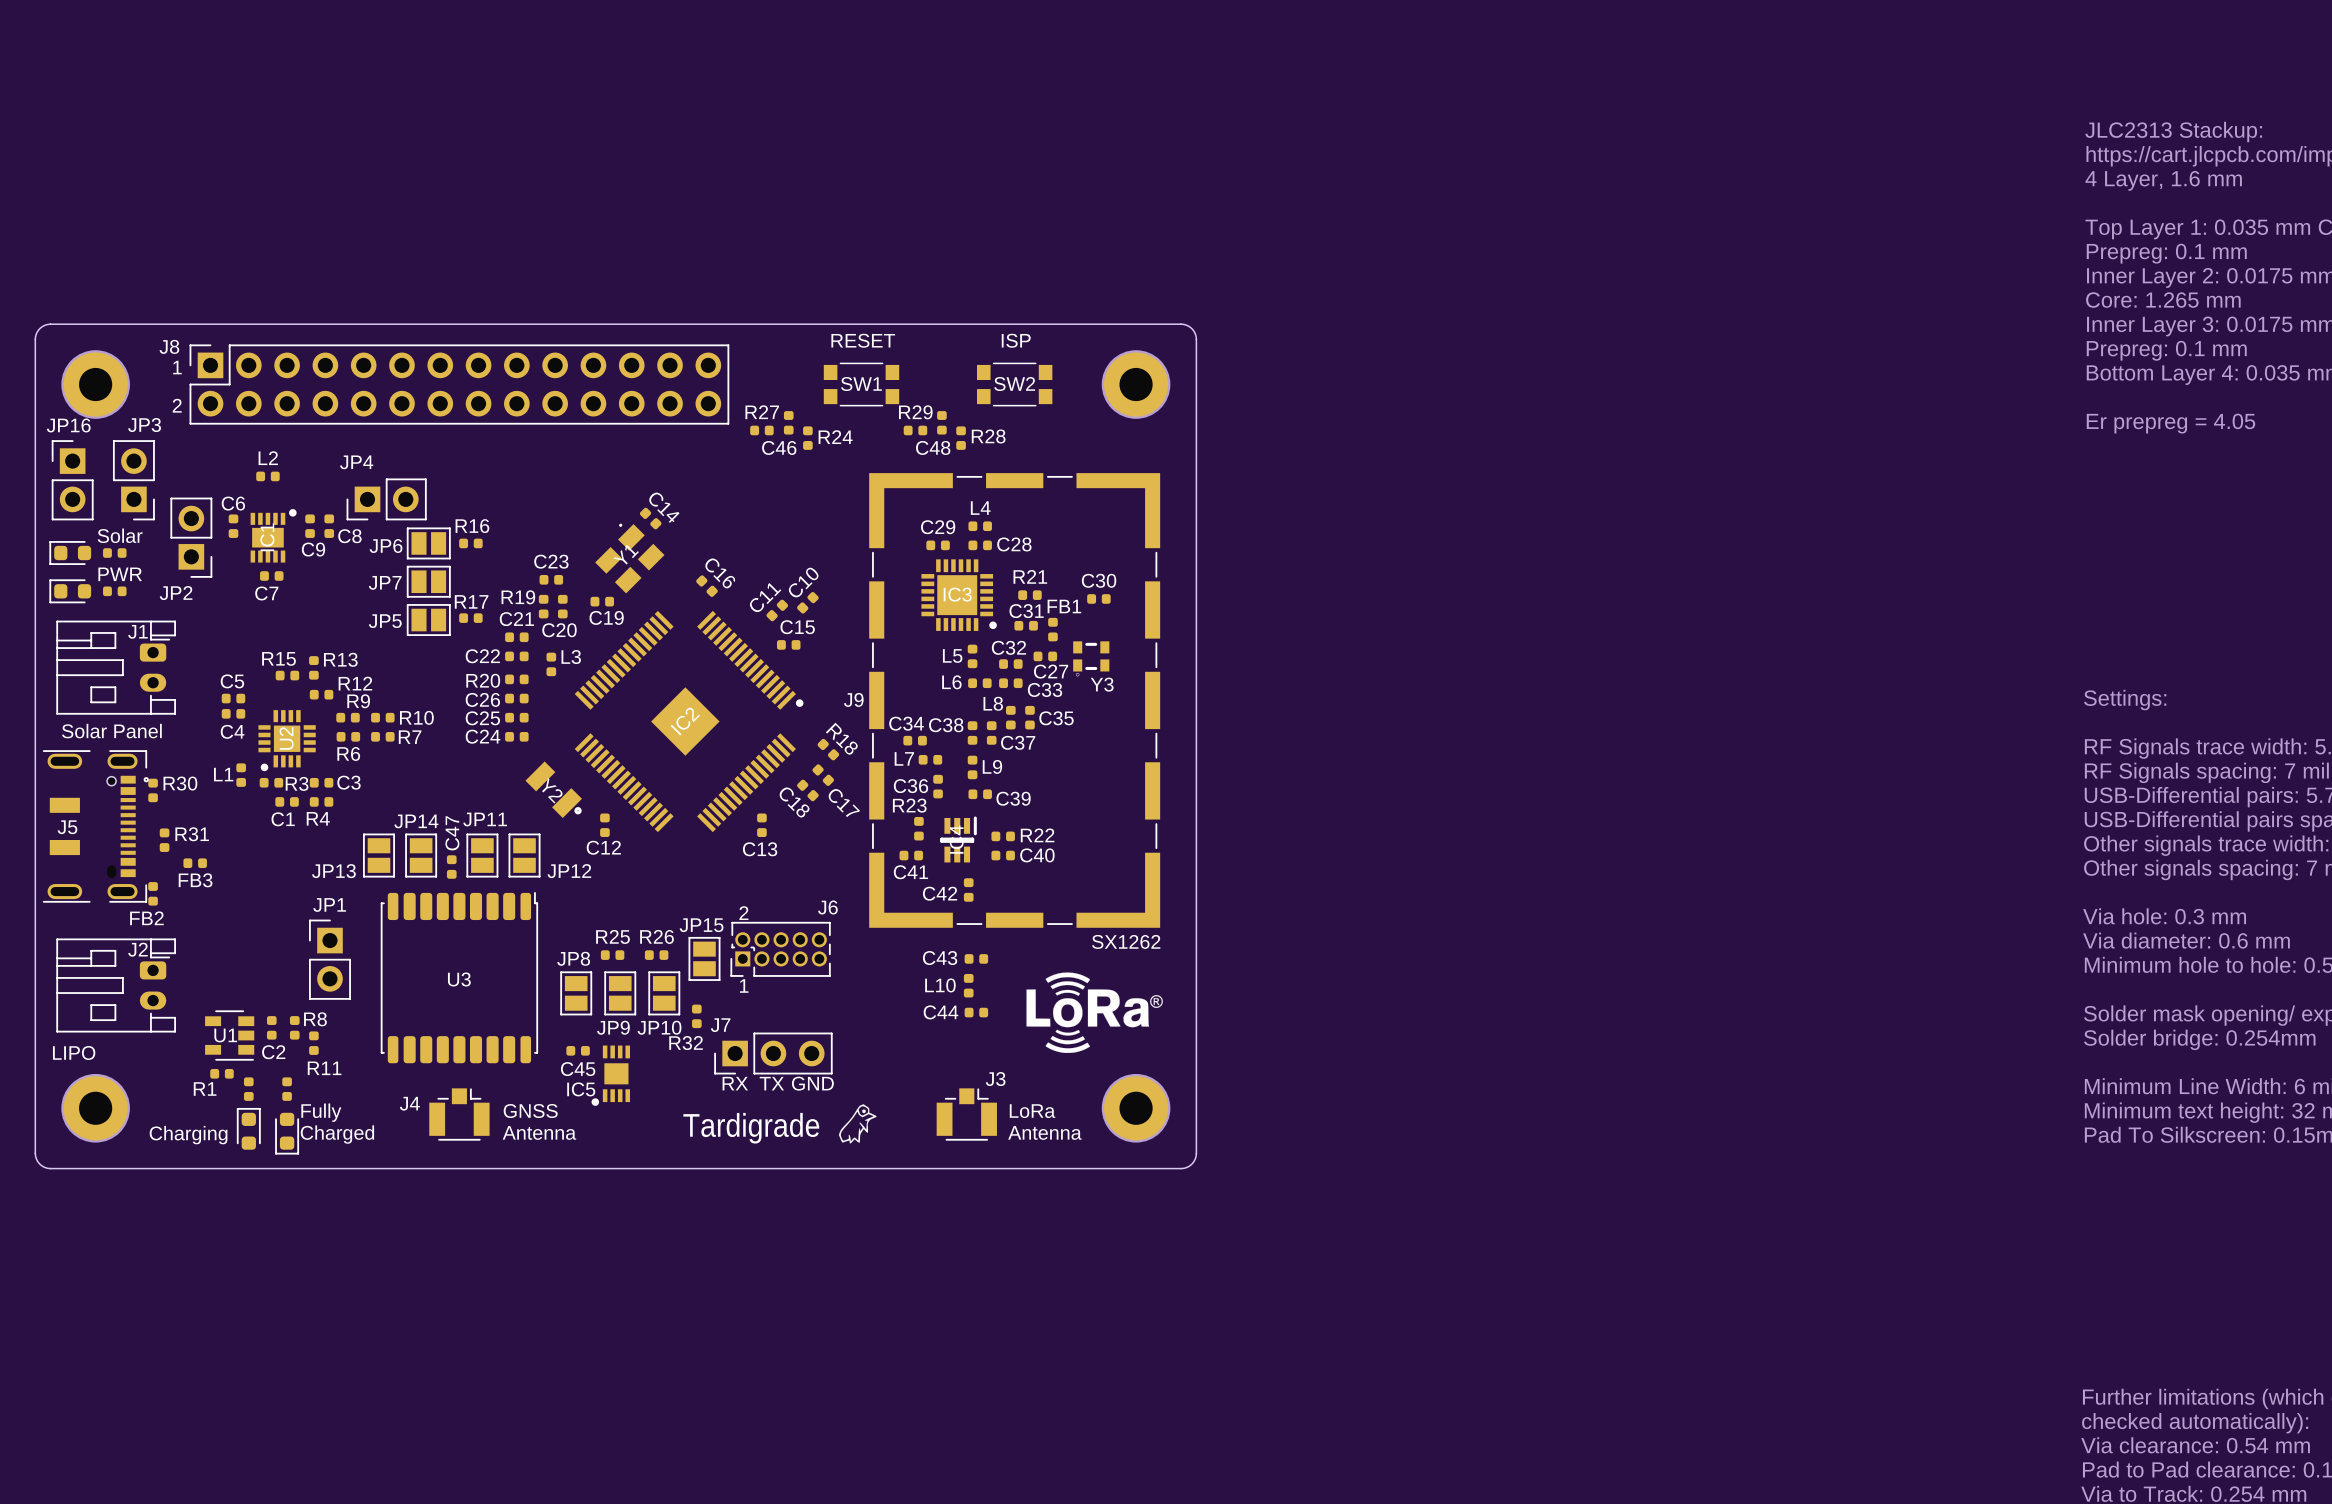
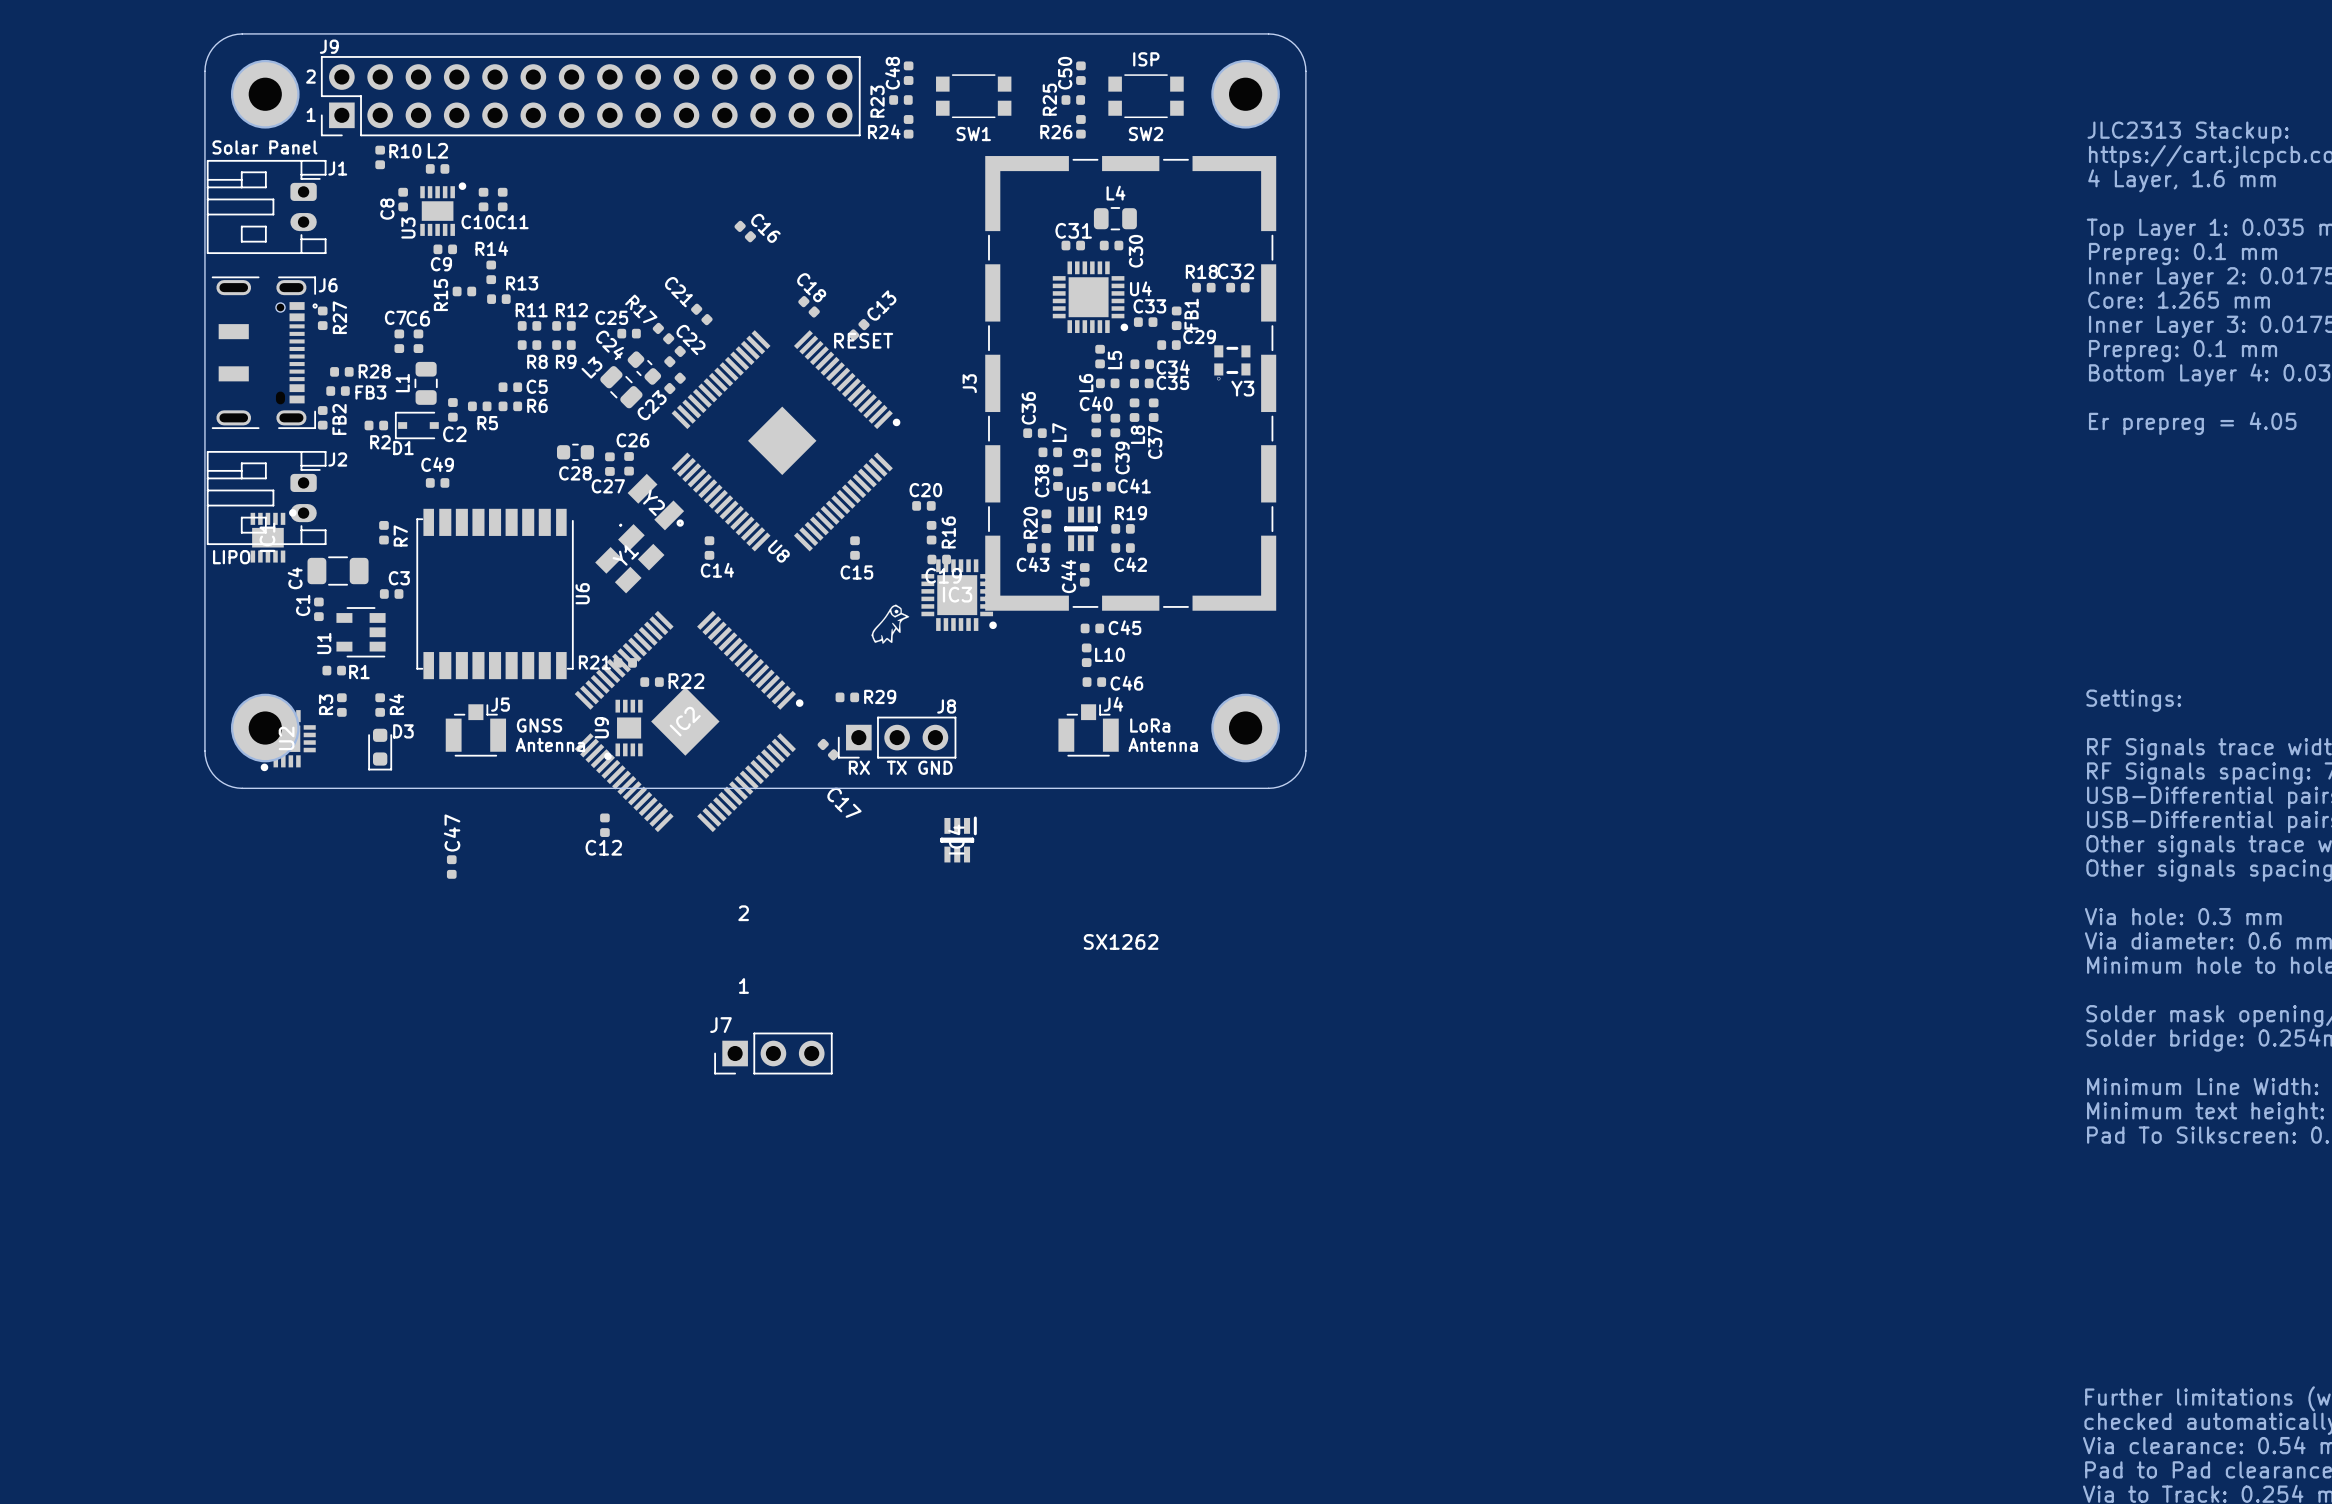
board edge: none -> (242, 33) (1268, 33) (1278, 35) (1291, 41) (1300, 52) (1305, 71) (1305, 750) (1303, 765) (1298, 773) (1287, 783) (1268, 788) (242, 788) (228, 785) (219, 780) (207, 765) (204, 750) (204, 71) (207, 56) (215, 44) (228, 36) (242, 33)
C50: none -> (1080, 73)
part: none -> (265, 94)
part: none -> (1245, 94)
text: none -> Solar Panel (264, 147)
R14: none -> (491, 272)
U4: none -> (1090, 297)
board edge: (50, 324) (1181, 324) (1190, 327) (1195, 333) (1196, 339) (1196, 1153) (1193, 1162) (1186, 1167) (1181, 1168) (50, 1168) (41, 1165) (36, 1159) (35, 1153) (35, 339) (39, 328) (50, 324) -> none
text position: ISP (1016, 340) -> ISP (1146, 59)
J8 footprint: [189, 344, 730, 425] -> [837, 716, 957, 759]
J8 name position: J8 (169, 346) -> J8 (946, 706)
text position: 1 (177, 367) -> 1 (311, 114)
part: (95, 384) -> none
SW1 position: (861, 384) -> (973, 96)
SW1 name position: SW1 (861, 384) -> SW1 (973, 134)
SW2 position: (1014, 384) -> (1146, 96)
SW2 name position: SW2 (1014, 384) -> SW2 (1146, 134)
part: (1136, 384) -> none
text position: 2 (177, 405) -> 2 (310, 76)
R5: none -> (479, 406)
R29 name position: R29 (915, 412) -> R29 (880, 696)
C46 rotation: 0° (788, 422) -> 90° clockwise (1094, 682)
C46 position: (788, 422) -> (1094, 682)
C48 position: (941, 422) -> (908, 73)
R2: none -> (376, 425)
D1: none -> (416, 425)
R27 rotation: 0° (761, 430) -> 90° clockwise (322, 318)
R27 position: (761, 430) -> (322, 318)
R29 position: (915, 430) -> (847, 697)
R24 name position: R24 (835, 437) -> R24 (884, 131)
R24 position: (807, 438) -> (908, 126)
R28 rotation: 0° (961, 438) -> 90° clockwise (341, 371)
R28 position: (961, 438) -> (341, 371)
U8: none -> (785, 440)
C46 name position: C46 (779, 447) -> C46 (1126, 683)
C48 name rotation: 0° (933, 447) -> 90° counterclockwise (892, 73)
J9 footprint: [869, 473, 1161, 928] -> [320, 56, 861, 137]
L2 position: (267, 476) -> (437, 168)
JP16: (72, 480) -> none
JP3: (133, 480) -> none
C49: none -> (437, 482)
JP4: (386, 499) -> none
C14 rotation: 0° (650, 518) -> 45° clockwise (709, 548)
C14 position: (650, 518) -> (709, 548)
L4 footprint: [968, 521, 992, 532] -> [1093, 207, 1137, 231]
C6 position: (233, 526) -> (418, 341)
C9 rotation: 0° (310, 526) -> 90° clockwise (445, 249)
C9 position: (310, 526) -> (445, 249)
C8 position: (329, 526) -> (403, 199)
C29 name position: C29 (938, 527) -> C29 (1199, 336)
U5: none -> (1082, 528)
text: Solar (120, 535) -> none
C8 name rotation: 0° (349, 536) -> 90° counterclockwise (387, 209)
C8 name position: C8 (349, 536) -> C8 (387, 209)
JP2: (191, 537) -> none
C28 footprint: [968, 540, 992, 551] -> [556, 443, 594, 461]
JP6: (428, 543) -> none
R16 rotation: 0° (470, 543) -> 90° clockwise (931, 532)
R16 position: (470, 543) -> (931, 532)
C28 name position: C28 (1014, 544) -> C28 (575, 473)
C29 position: (938, 545) -> (1169, 345)
part: (70, 553) -> none
part: (114, 553) -> none
text: none -> LIPO (231, 557)
C23 name position: C23 (551, 561) -> C23 (652, 405)
C16 name position: C16 (720, 573) -> C16 (765, 228)
text: PWR (120, 574) -> none
C7 rotation: 0° (271, 575) -> 90° clockwise (399, 341)
C7 position: (271, 575) -> (399, 341)
R21 name position: R21 (1030, 576) -> R21 (594, 662)
C23 rotation: 0° (551, 579) -> 45° counterclockwise (675, 383)
C23 position: (551, 579) -> (675, 383)
C30 name rotation: 0° (1099, 580) -> 90° counterclockwise (1136, 251)
JP7: (428, 581) -> none
C10 name position: C10 (803, 582) -> C10 (477, 222)
C16 position: (706, 586) -> (745, 231)
part: (70, 591) -> none
part: (114, 591) -> none
U6: none -> (495, 593)
R21 position: (1029, 595) -> (625, 662)
C11 name position: C11 (765, 597) -> C11 (512, 222)
C30 position: (1098, 598) -> (1111, 245)
C19 position: (602, 601) -> (939, 559)
C10 rotation: 0° (807, 602) -> 45° counterclockwise (483, 199)
C10 position: (807, 602) -> (483, 199)
drawing: none -> [871, 604, 910, 644]
R19 rotation: 0° (543, 606) -> 90° clockwise (1123, 528)
R19 position: (543, 606) -> (1123, 528)
C20 rotation: 0° (562, 606) -> 90° clockwise (923, 505)
C20 position: (562, 606) -> (923, 505)
FB1 name rotation: 0° (1064, 606) -> 90° counterclockwise (1191, 314)
C11 rotation: 0° (777, 610) -> 45° counterclockwise (502, 199)
C11 position: (777, 610) -> (502, 199)
R17 rotation: 0° (470, 618) -> 45° clockwise (663, 333)
R17 position: (470, 618) -> (663, 333)
JP5: (428, 620) -> none
C31 position: (1026, 625) -> (1073, 245)
FB1 position: (1052, 629) -> (1176, 318)
J1 name position: J1 (137, 631) -> J1 (337, 168)
C21 rotation: 0° (516, 637) -> 45° clockwise (701, 314)
C21 position: (516, 637) -> (701, 314)
C15 rotation: 0° (788, 644) -> 90° clockwise (855, 548)
C15 position: (788, 644) -> (855, 548)
L3 footprint: [546, 652, 557, 677] -> [600, 366, 643, 409]
C22 name position: C22 (482, 656) -> C22 (691, 340)
C22 rotation: 0° (516, 656) -> 45° counterclockwise (675, 356)
C22 position: (516, 656) -> (675, 356)
L5 name rotation: 0° (952, 656) -> 90° counterclockwise (1114, 360)
L5 name position: L5 (952, 656) -> L5 (1114, 360)
L5 position: (972, 656) -> (1100, 356)
C27 rotation: 0° (1045, 656) -> 90° clockwise (609, 464)
C27 position: (1045, 656) -> (609, 464)
L3 name position: L3 (571, 657) -> L3 (591, 367)
R15 name rotation: 0° (279, 658) -> 90° counterclockwise (440, 295)
Y3 position: (1091, 658) -> (1232, 362)
C32 position: (1010, 664) -> (1237, 287)
J1 position: (116, 667) -> (266, 206)
R13 rotation: 0° (313, 667) -> 90° clockwise (498, 299)
R13 position: (313, 667) -> (498, 299)
R15 position: (287, 675) -> (464, 291)
R20 rotation: 0° (516, 679) -> 90° clockwise (1046, 521)
R20 position: (516, 679) -> (1046, 521)
C5 name position: C5 (232, 681) -> C5 (537, 386)
L6 name rotation: 0° (951, 682) -> 90° counterclockwise (1086, 383)
R12 name position: R12 (355, 683) -> R12 (571, 310)
L6 position: (979, 683) -> (1107, 383)
C33 position: (1010, 683) -> (1145, 322)
C33 name position: C33 (1045, 689) -> C33 (1149, 306)
R12 position: (321, 694) -> (563, 325)
C5 position: (233, 698) -> (510, 387)
C26 rotation: 0° (516, 698) -> 90° clockwise (629, 463)
C26 position: (516, 698) -> (629, 463)
J9 name position: J9 (853, 699) -> J9 (329, 46)
R9 name position: R9 (358, 701) -> R9 (566, 361)
L8 name rotation: 0° (993, 703) -> 90° counterclockwise (1137, 434)
L8 name position: L8 (993, 703) -> L8 (1137, 434)
C4 footprint: [221, 709, 246, 719] -> [307, 556, 369, 586]
R9 position: (348, 717) -> (563, 345)
R10 rotation: 0° (382, 717) -> 90° clockwise (380, 157)
R10 position: (382, 717) -> (380, 157)
C25 position: (516, 717) -> (629, 333)
L8 position: (1010, 717) -> (1134, 410)
C35 rotation: 0° (1029, 717) -> 90° clockwise (1141, 383)
C35 position: (1029, 717) -> (1141, 383)
C25 name position: C25 (482, 718) -> C25 (611, 317)
C34 name position: C34 (906, 723) -> C34 (1173, 367)
text: none -> GNSS (539, 725)
C38 name rotation: 0° (946, 725) -> 90° counterclockwise (1042, 481)
text: none -> LoRa (1150, 725)
part: none -> (265, 728)
part: none -> (1245, 728)
U9: none -> (623, 729)
text: Solar Panel (111, 731) -> none
C4 name position: C4 (232, 731) -> C4 (295, 578)
C24 footprint: [505, 732, 529, 742] -> [627, 351, 662, 385]
C38 position: (972, 732) -> (1057, 479)
C37 position: (991, 732) -> (1153, 410)
R6 position: (348, 736) -> (510, 406)
R7 rotation: 0° (382, 736) -> 90° clockwise (383, 532)
R7 position: (382, 736) -> (383, 532)
C34 position: (915, 740) -> (1142, 364)
C37 name rotation: 0° (1018, 742) -> 90° counterclockwise (1155, 442)
text: none -> Antenna (550, 744)
text: none -> Antenna (1163, 744)
D3: none -> (380, 749)
J5 footprint: [42, 750, 149, 903] -> [445, 704, 507, 757]
R6 name position: R6 (348, 753) -> R6 (537, 405)
L7 name rotation: 0° (904, 758) -> 90° counterclockwise (1059, 432)
L7 name position: L7 (904, 758) -> L7 (1059, 432)
L7 position: (930, 759) -> (1050, 452)
L1 footprint: [236, 763, 246, 787] -> [414, 361, 438, 405]
L9 name rotation: 0° (992, 766) -> 90° counterclockwise (1080, 457)
L9 name position: L9 (992, 766) -> L9 (1080, 457)
L9 position: (972, 767) -> (1096, 459)
R18 rotation: 0° (823, 775) -> 45° counterclockwise (1203, 287)
R18 position: (823, 775) -> (1203, 287)
C1 rotation: 0° (271, 782) -> 90° clockwise (318, 609)
C1 position: (271, 782) -> (318, 609)
C3 position: (321, 782) -> (391, 593)
C3 name position: C3 (348, 782) -> C3 (399, 578)
R3 name position: R3 (297, 783) -> R3 (326, 704)
C36 rotation: 0° (938, 786) -> 90° clockwise (1034, 433)
C36 position: (938, 786) -> (1034, 433)
Y2 position: (553, 789) -> (655, 502)
R30: (153, 790) -> none
C18 position: (807, 790) -> (809, 306)
C39 rotation: 0° (980, 794) -> 90° clockwise (1115, 425)
C39 position: (980, 794) -> (1115, 425)
R3 rotation: 0° (287, 801) -> 90° clockwise (341, 705)
R3 position: (287, 801) -> (341, 705)
R4 rotation: 0° (321, 801) -> 90° clockwise (380, 705)
R4 position: (321, 801) -> (380, 705)
C18 name position: C18 (794, 802) -> C18 (811, 287)
C13 rotation: 0° (761, 825) -> 45° clockwise (858, 329)
C13 position: (761, 825) -> (858, 329)
J5 name position: J5 (67, 827) -> J5 (500, 704)
R23 rotation: 0° (918, 828) -> 90° clockwise (900, 100)
R23 position: (918, 828) -> (900, 100)
R22 position: (1003, 836) -> (652, 682)
R31: (164, 840) -> none
C13 name position: C13 (760, 849) -> C13 (881, 305)
JP13: (379, 855) -> none
JP14: (421, 855) -> none
JP11: (482, 855) -> none
JP12: (524, 855) -> none
C41 position: (911, 855) -> (1103, 486)
C40 rotation: 0° (1003, 855) -> 90° clockwise (1096, 425)
C40 position: (1003, 855) -> (1096, 425)
C40 name position: C40 (1037, 855) -> C40 (1096, 403)
FB3 position: (195, 863) -> (338, 391)
C41 name position: C41 (910, 872) -> C41 (1134, 486)
FB3 name position: FB3 (195, 880) -> FB3 (370, 392)
C42 rotation: 0° (968, 890) -> 90° clockwise (1123, 548)
C42 position: (968, 890) -> (1123, 548)
U3 footprint: [380, 891, 539, 1064] -> [420, 182, 467, 236]
FB2 position: (153, 893) -> (322, 417)
C42 name position: C42 (940, 893) -> C42 (1130, 564)
J6 name position: J6 (827, 907) -> J6 (328, 285)
FB2 name rotation: 0° (146, 918) -> 90° counterclockwise (339, 419)
J6 footprint: [730, 921, 831, 977] -> [211, 276, 318, 430]
R25 name rotation: 0° (612, 936) -> 90° counterclockwise (1049, 99)
R26 name position: R26 (657, 936) -> R26 (1056, 132)
J2 name position: J2 (137, 949) -> J2 (337, 459)
R25 position: (612, 955) -> (1073, 100)
R26 rotation: 0° (656, 955) -> 90° clockwise (1080, 126)
R26 position: (656, 955) -> (1080, 126)
JP15: (704, 958) -> none
C43 name position: C43 (940, 958) -> C43 (1033, 564)
C43 position: (976, 958) -> (1038, 548)
JP1: (329, 959) -> none
drawing: [1026, 972, 1163, 1053] -> none
U3 name position: U3 (459, 979) -> U3 (408, 228)
J2 position: (116, 985) -> (266, 498)
L10 name position: L10 (940, 985) -> L10 (1109, 654)
L10 position: (968, 985) -> (1086, 655)
JP8: (576, 993) -> none
JP9: (620, 993) -> none
JP10: (664, 993) -> none
C44 rotation: 0° (976, 1012) -> 90° clockwise (1084, 574)
C44 position: (976, 1012) -> (1084, 574)
R32: (696, 1016) -> none
C2 position: (271, 1027) -> (452, 409)
R8 rotation: 0° (294, 1027) -> 90° clockwise (529, 345)
R8 position: (294, 1027) -> (529, 345)
U1 name rotation: 0° (225, 1035) -> 90° counterclockwise (324, 643)
U1 position: (229, 1035) -> (361, 632)
R11 rotation: 0° (313, 1043) -> 90° clockwise (529, 325)
R11 position: (313, 1043) -> (529, 325)
C45 position: (578, 1050) -> (1092, 628)
text: LIPO (74, 1053) -> none
R11 name position: R11 (324, 1068) -> R11 (531, 310)
C45 name position: C45 (578, 1069) -> C45 (1124, 627)
R1 position: (222, 1073) -> (334, 670)
IC5: (610, 1075) -> none
J3 name position: J3 (995, 1079) -> J3 (969, 383)
text position: RX (735, 1083) -> RX (859, 767)
text position: TX (771, 1083) -> TX (896, 767)
text position: GND (812, 1083) -> GND (935, 767)
J3 footprint: [936, 1088, 997, 1141] -> [985, 156, 1277, 611]
R1 name position: R1 (205, 1089) -> R1 (359, 672)
part: (248, 1089) -> none
part: (287, 1089) -> none
J4 name position: J4 (409, 1103) -> J4 (1113, 704)
drawing: [838, 1104, 877, 1144] -> none
part: (95, 1108) -> none
part: (1136, 1108) -> none
text: GNSS (530, 1111) -> none
text: LoRa (1032, 1111) -> none
text: Fully (321, 1112) -> none
J4 position: (459, 1114) -> (1088, 730)
part: (248, 1128) -> none
text: Tardigrade (751, 1128) -> none
text: Antenna (539, 1132) -> none
text: Antenna (1044, 1132) -> none
part: (287, 1133) -> none
text: Charged (337, 1134) -> none
text: Charging (188, 1135) -> none

